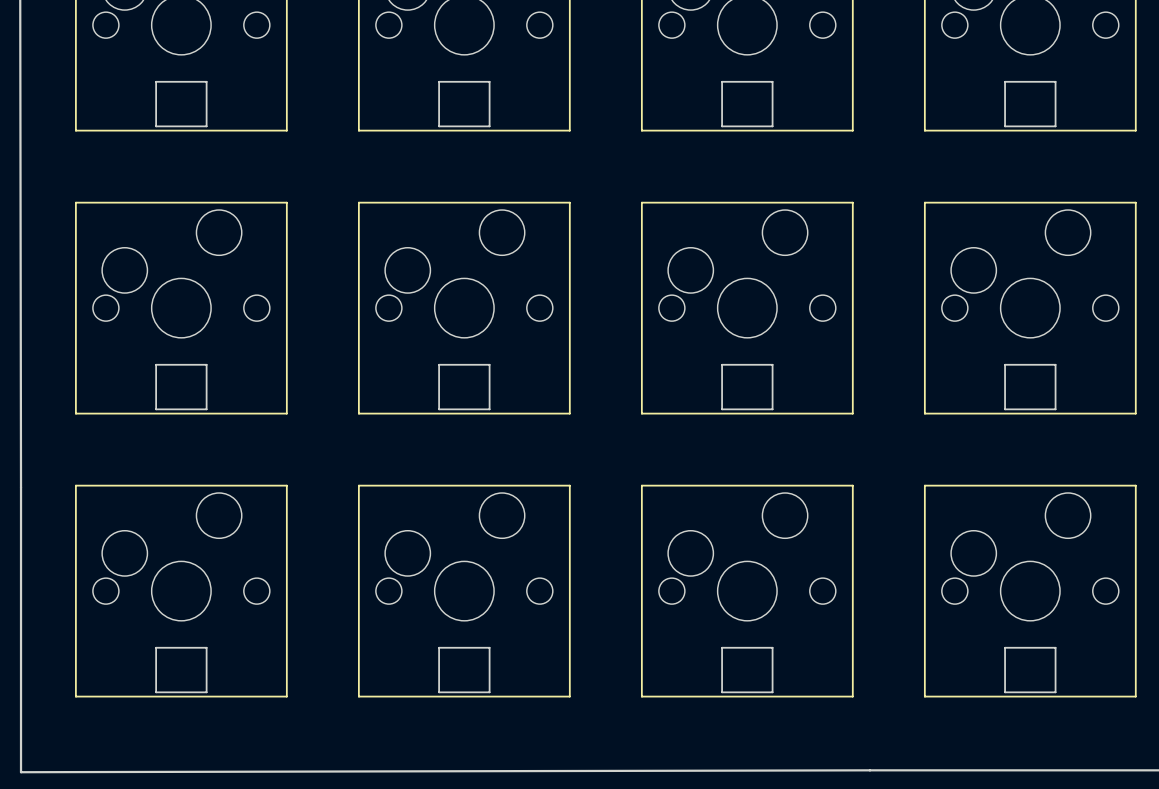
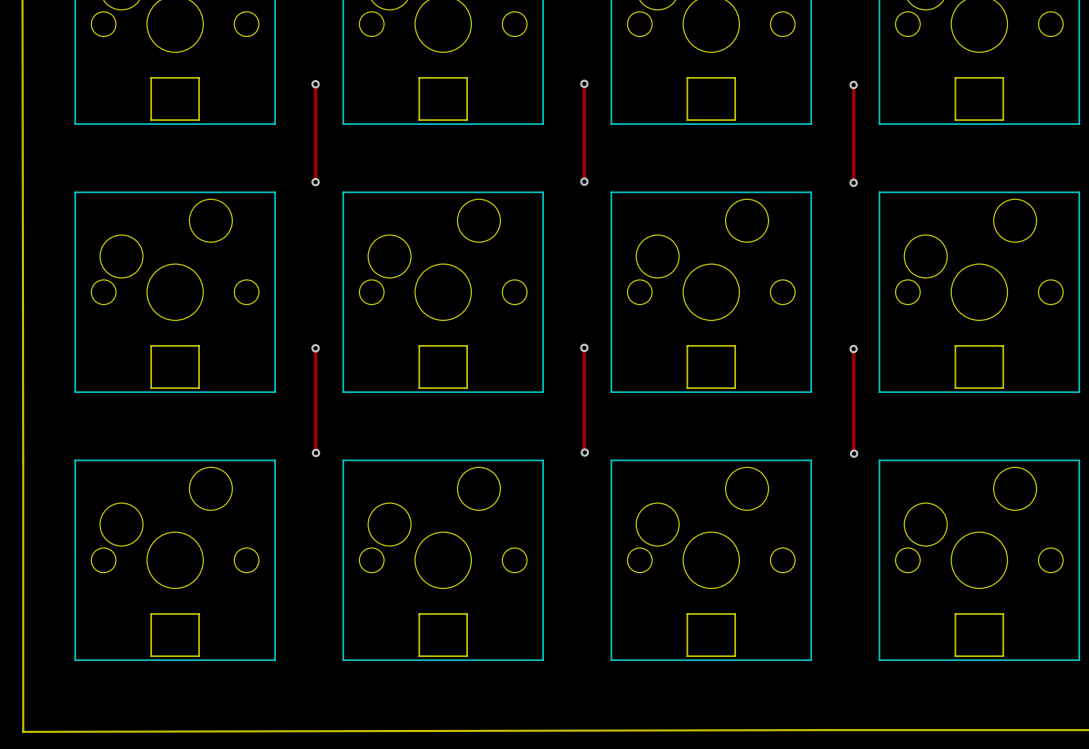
track: none -> (315, 84) (315, 182)
via: none -> (315, 84)
track: none -> (584, 83) (584, 181)
via: none -> (584, 83)
track: none -> (853, 84) (853, 182)
via: none -> (853, 84)
via: none -> (315, 182)
via: none -> (584, 181)
via: none -> (853, 182)
track: none -> (584, 347) (584, 452)
via: none -> (584, 347)
track: none -> (315, 348) (315, 452)
via: none -> (315, 348)
track: none -> (853, 349) (853, 453)
via: none -> (853, 349)
via: none -> (315, 452)
via: none -> (584, 452)
via: none -> (854, 453)

